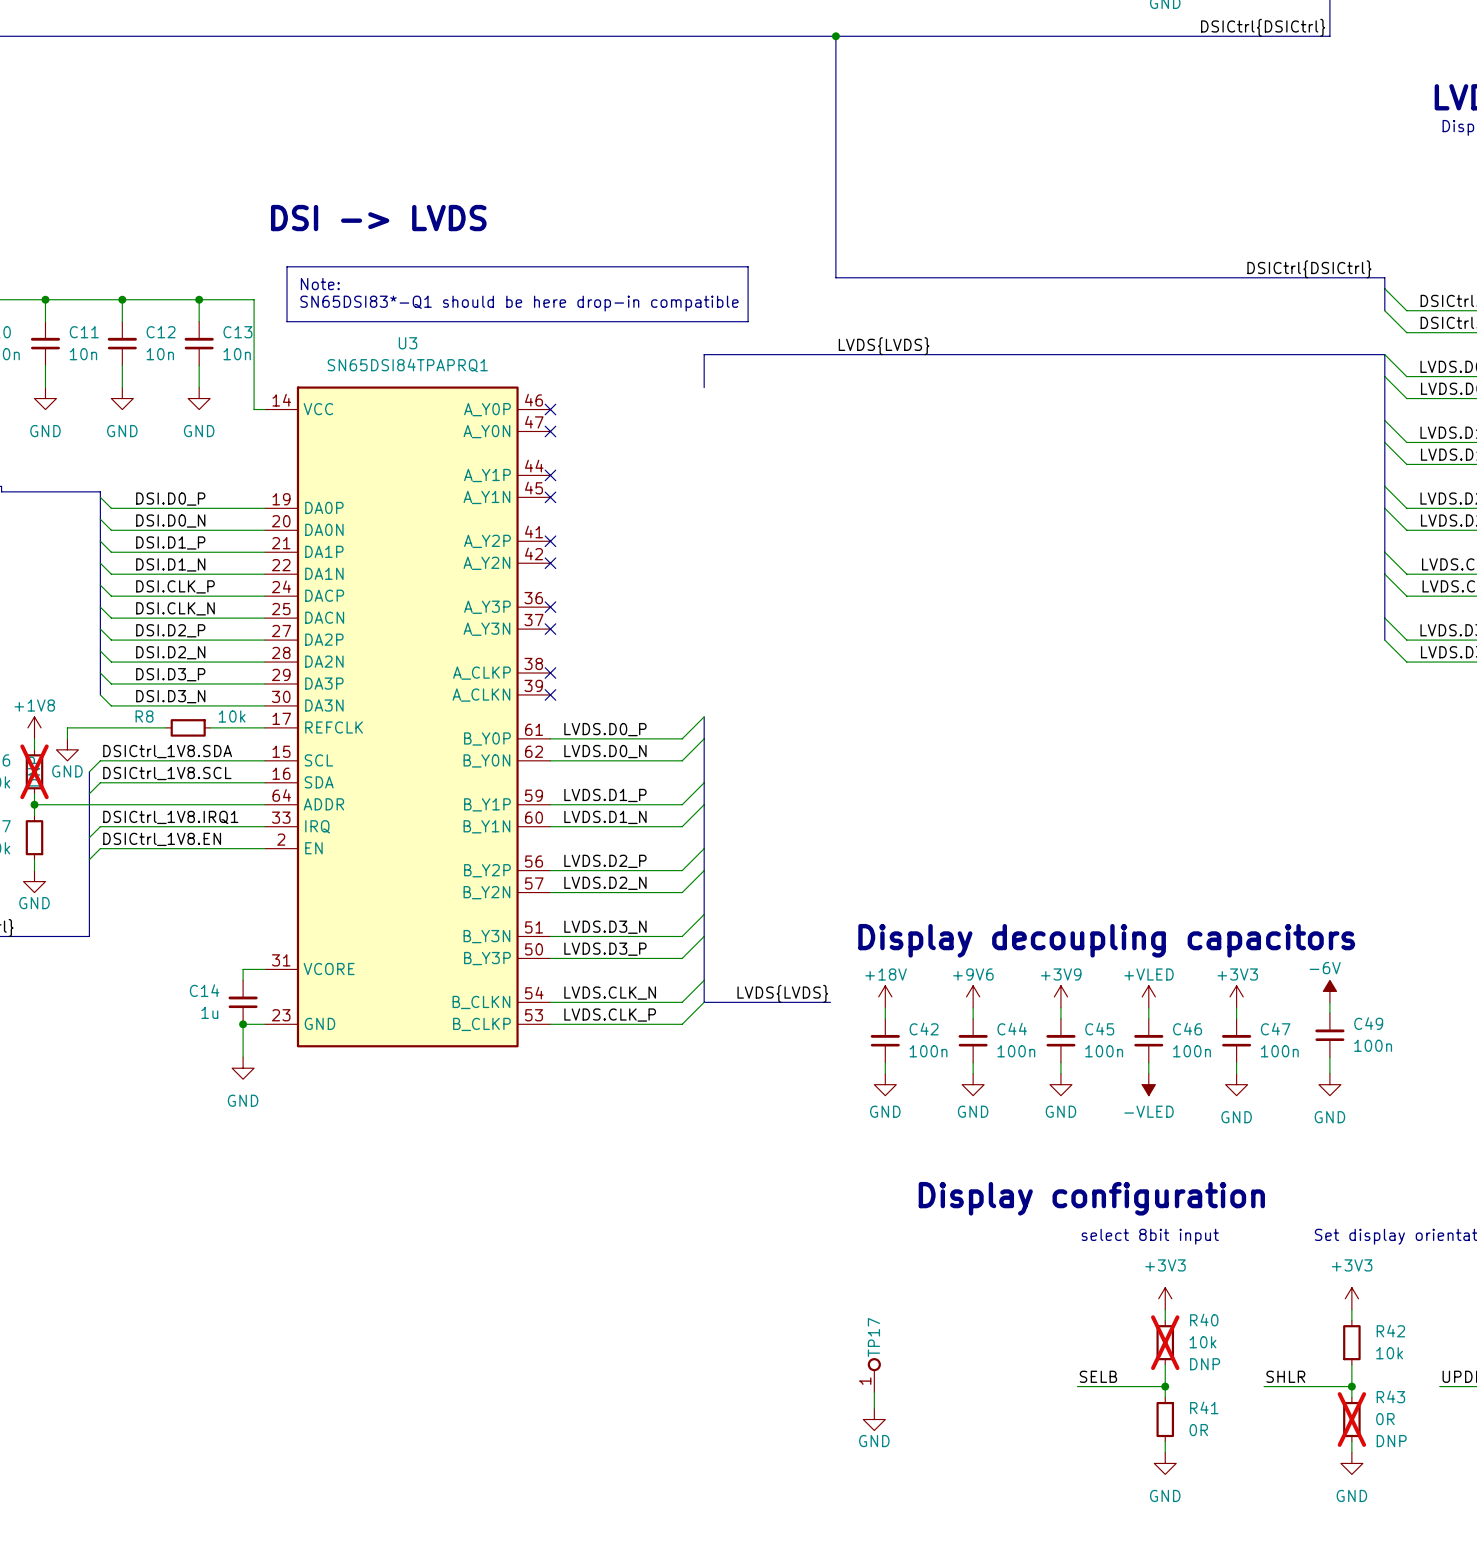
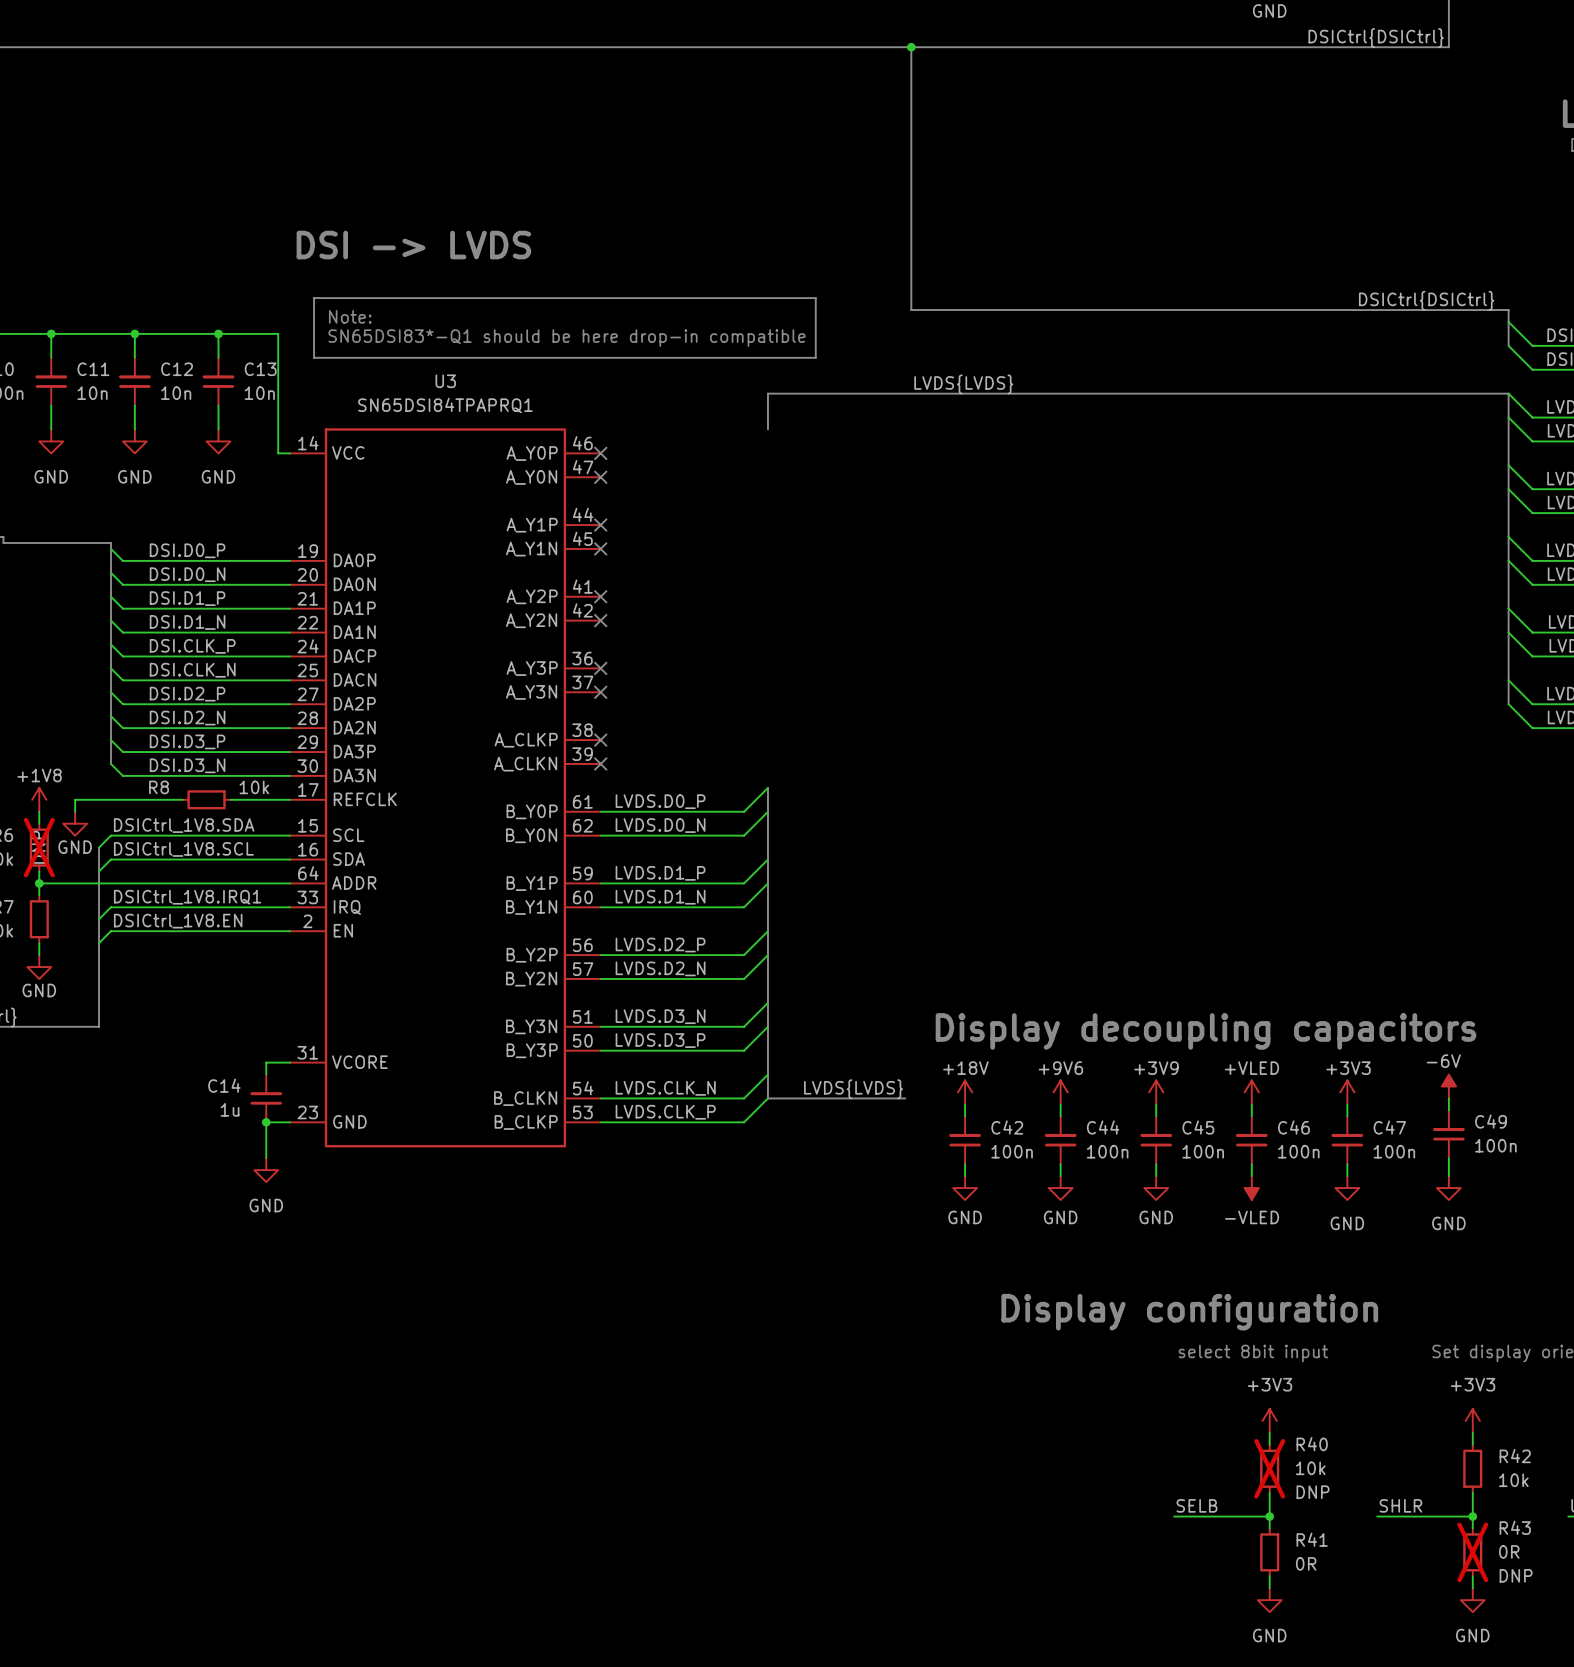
TP17: (874, 1375) -> none
wire: (874, 1392) (874, 1408) -> none
power symbol: GND (874, 1419) -> none

